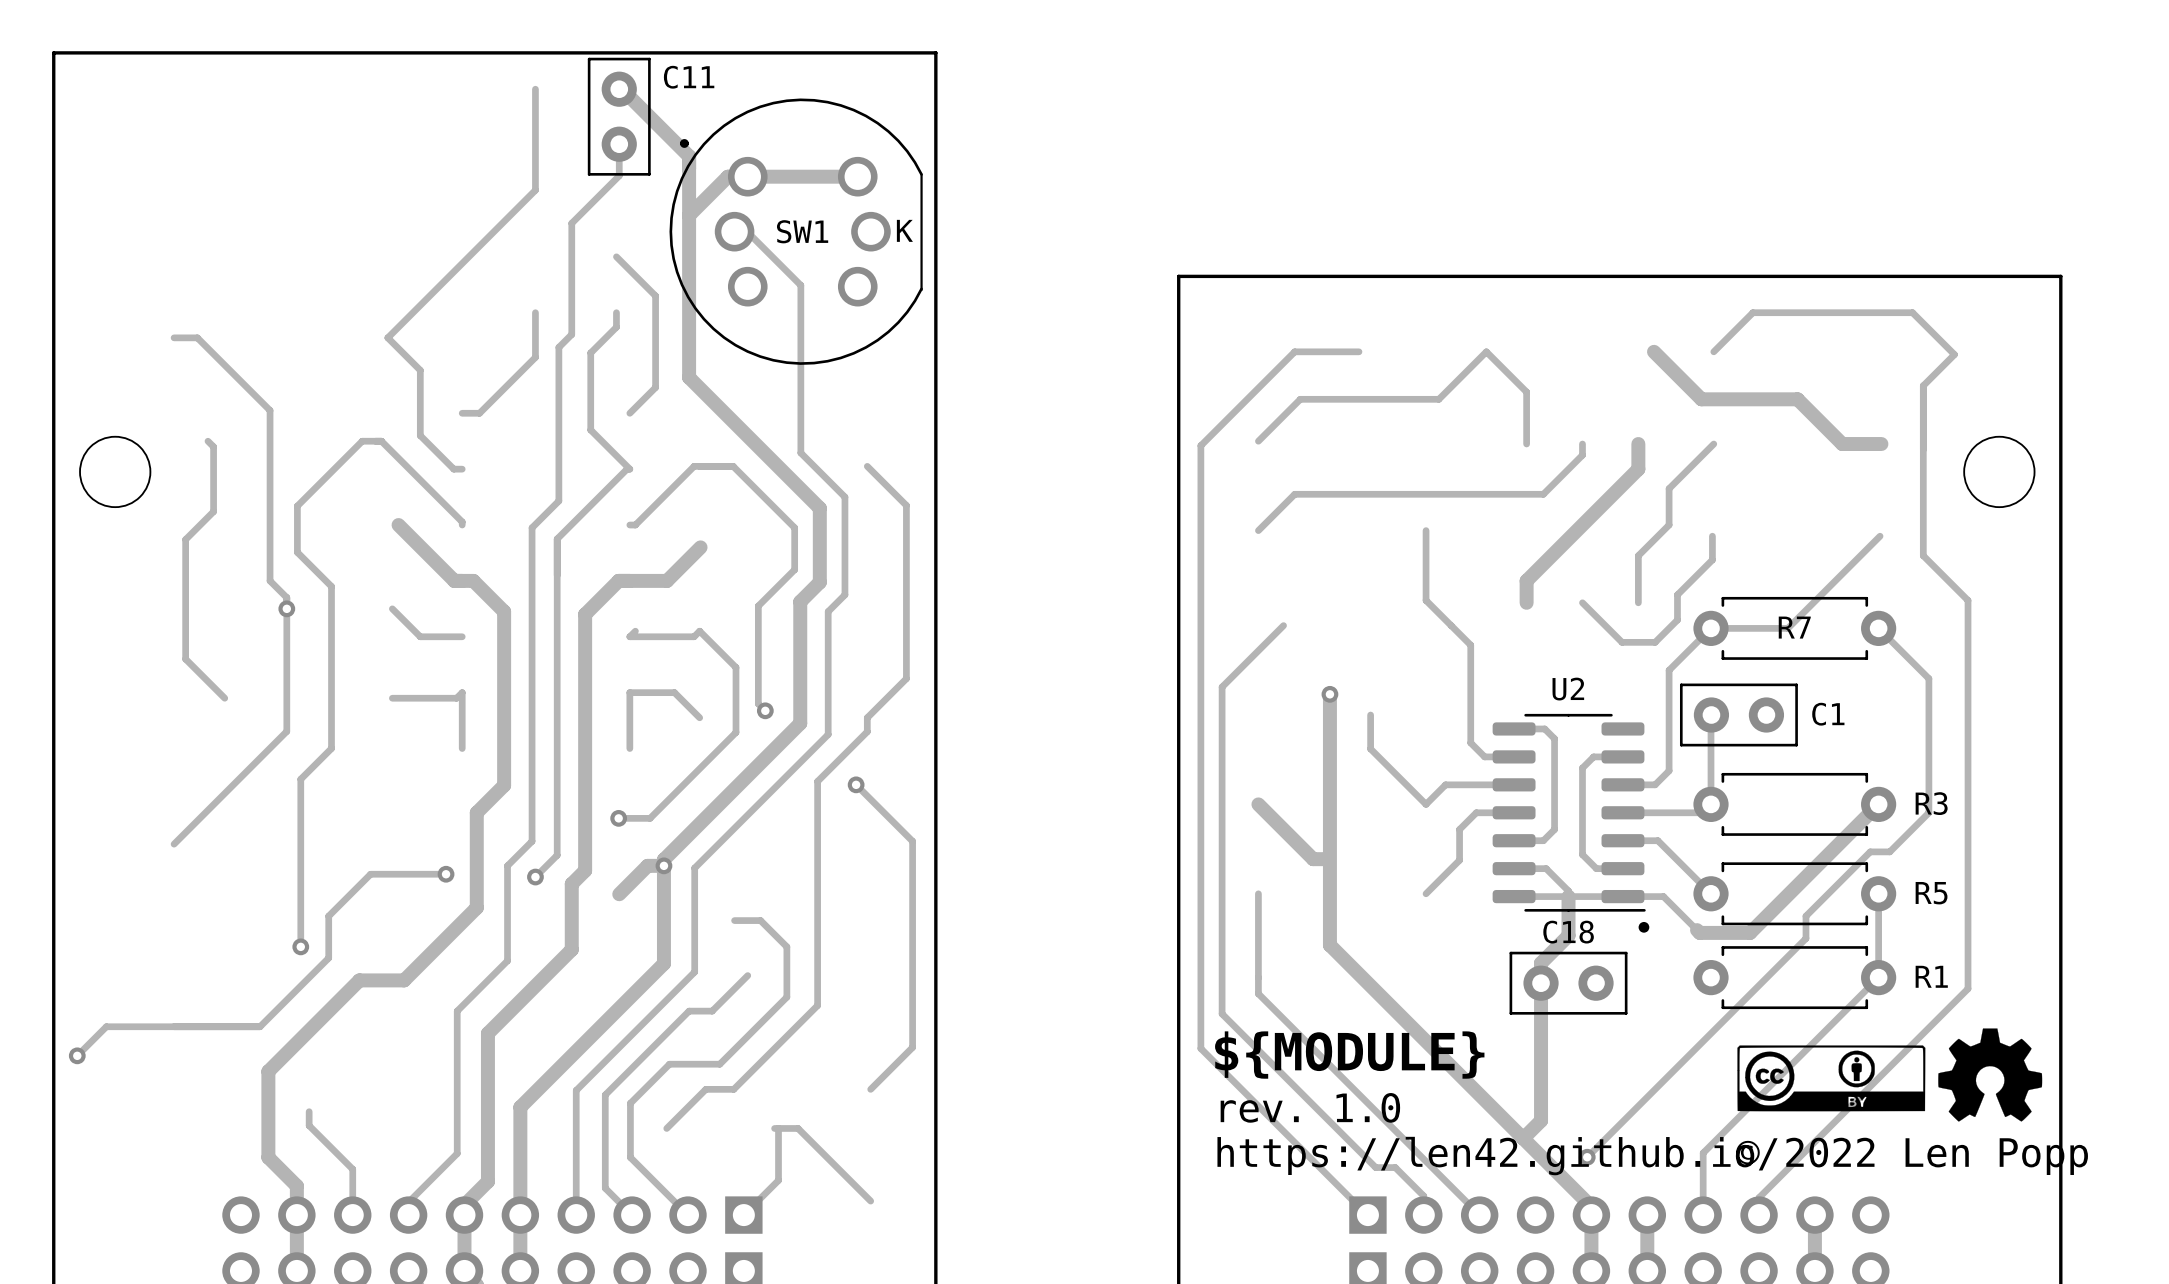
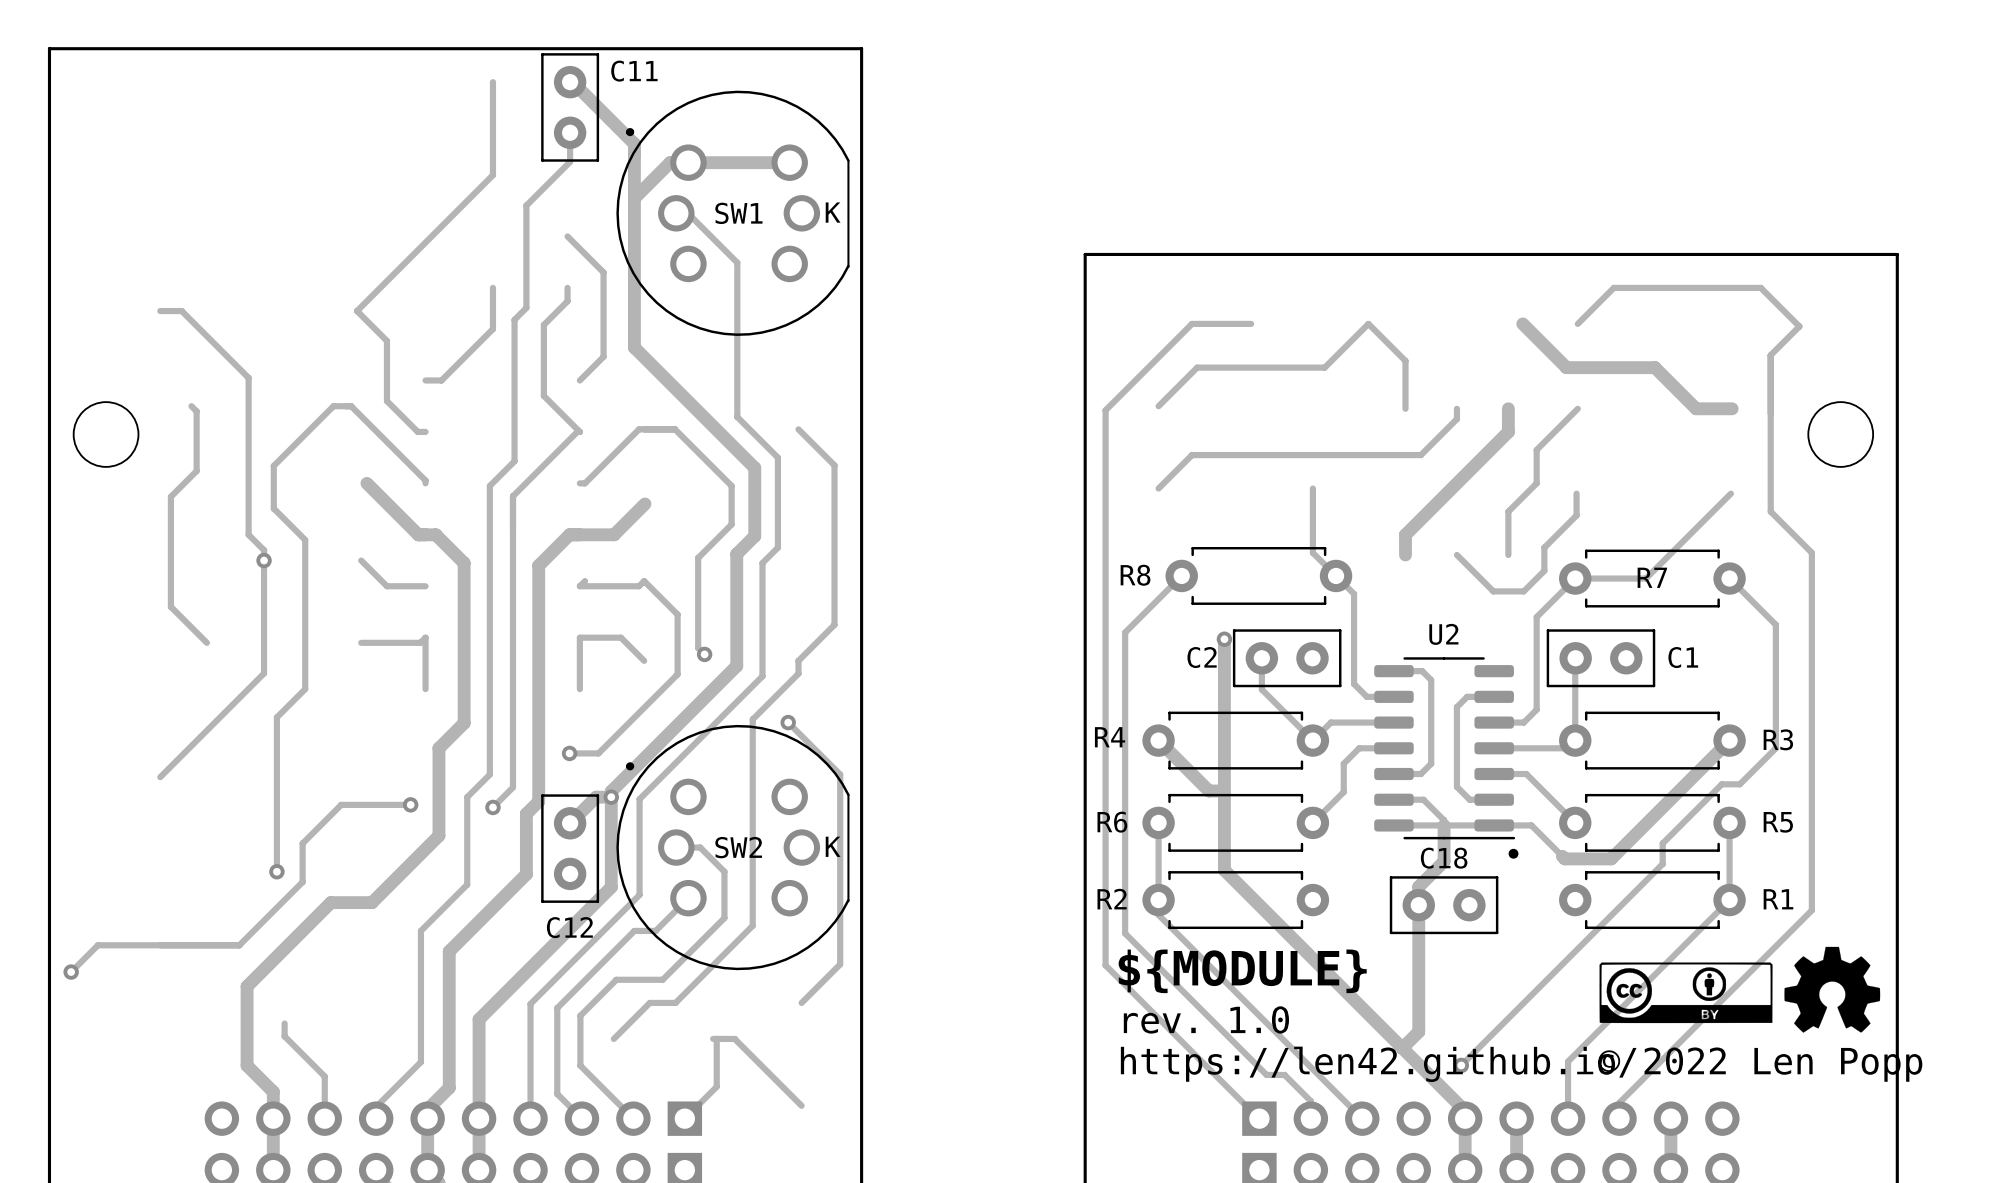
R8: none -> (1258, 575)
C2: none -> (1287, 658)
R4: none -> (1235, 740)
R6: none -> (1235, 822)
SW2: none -> (733, 847)
C12: none -> (570, 848)
R2: none -> (1235, 900)

